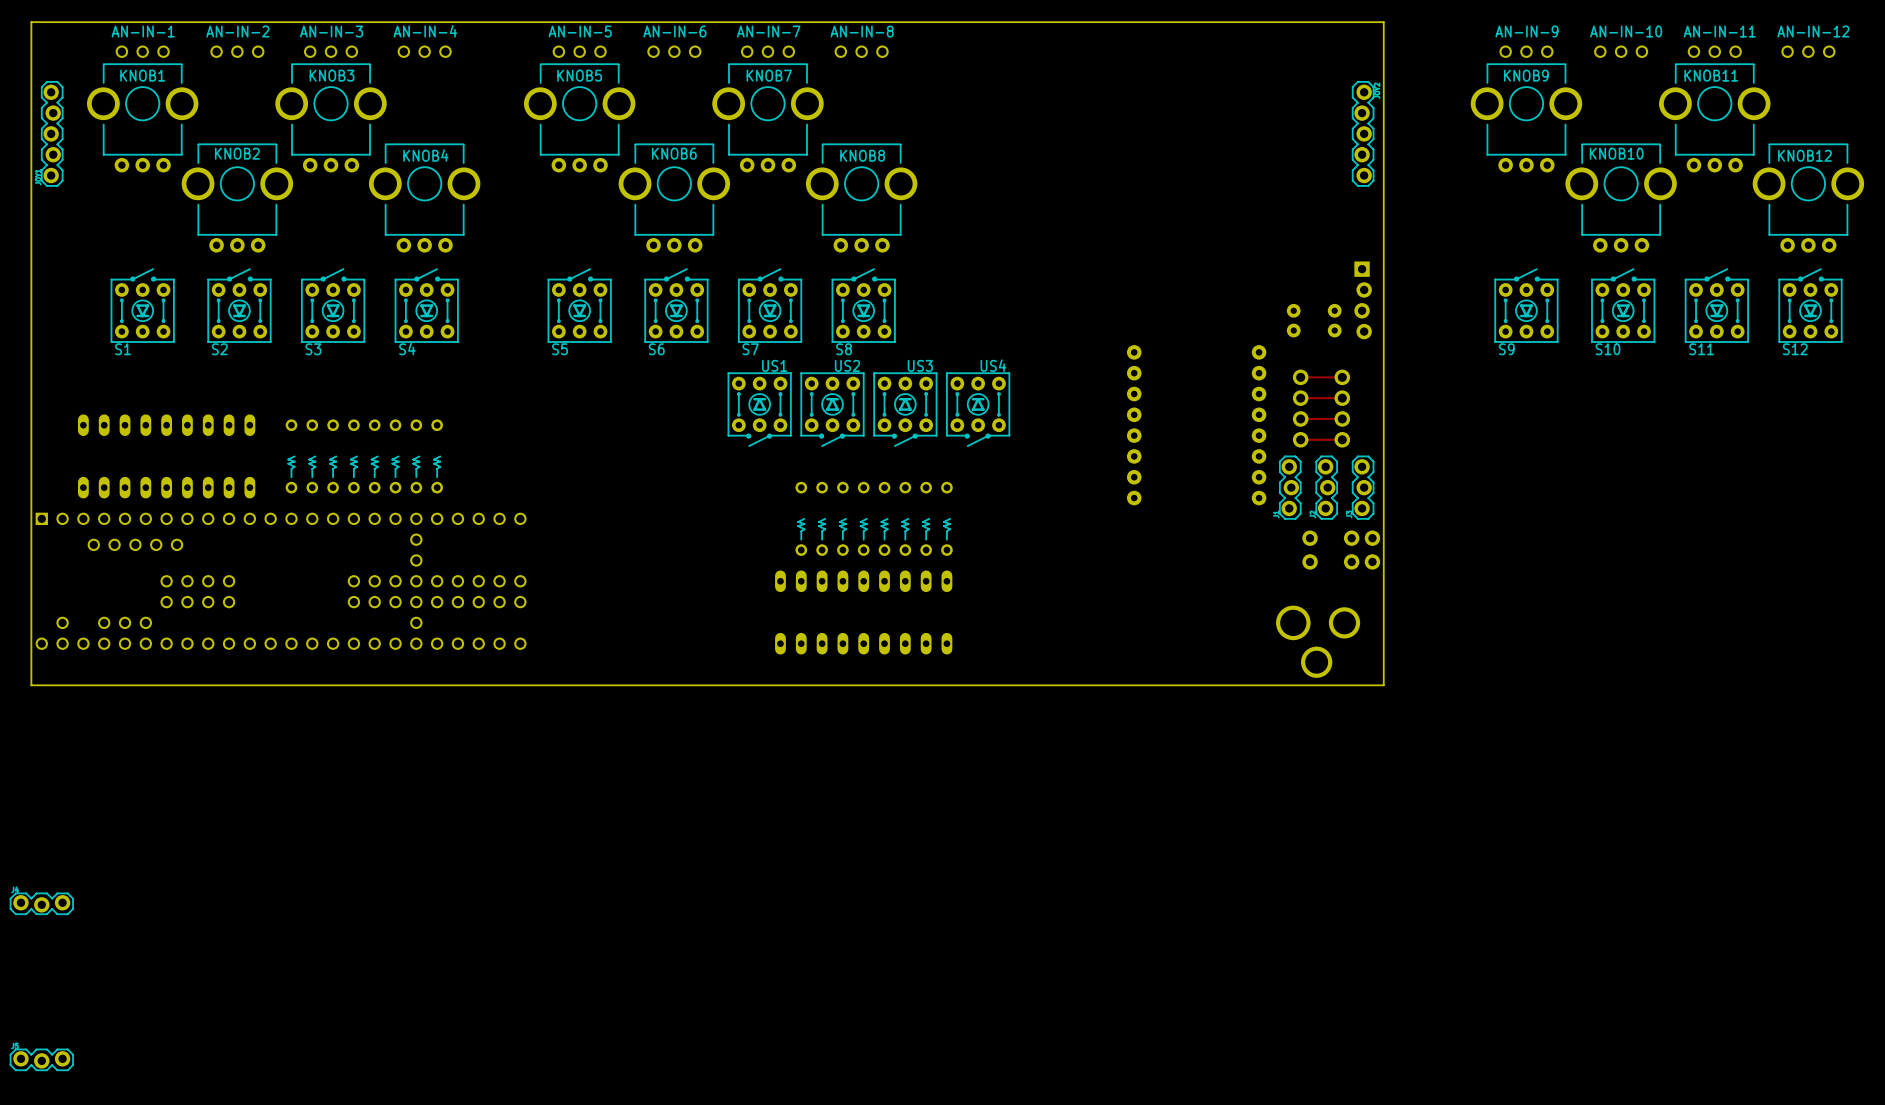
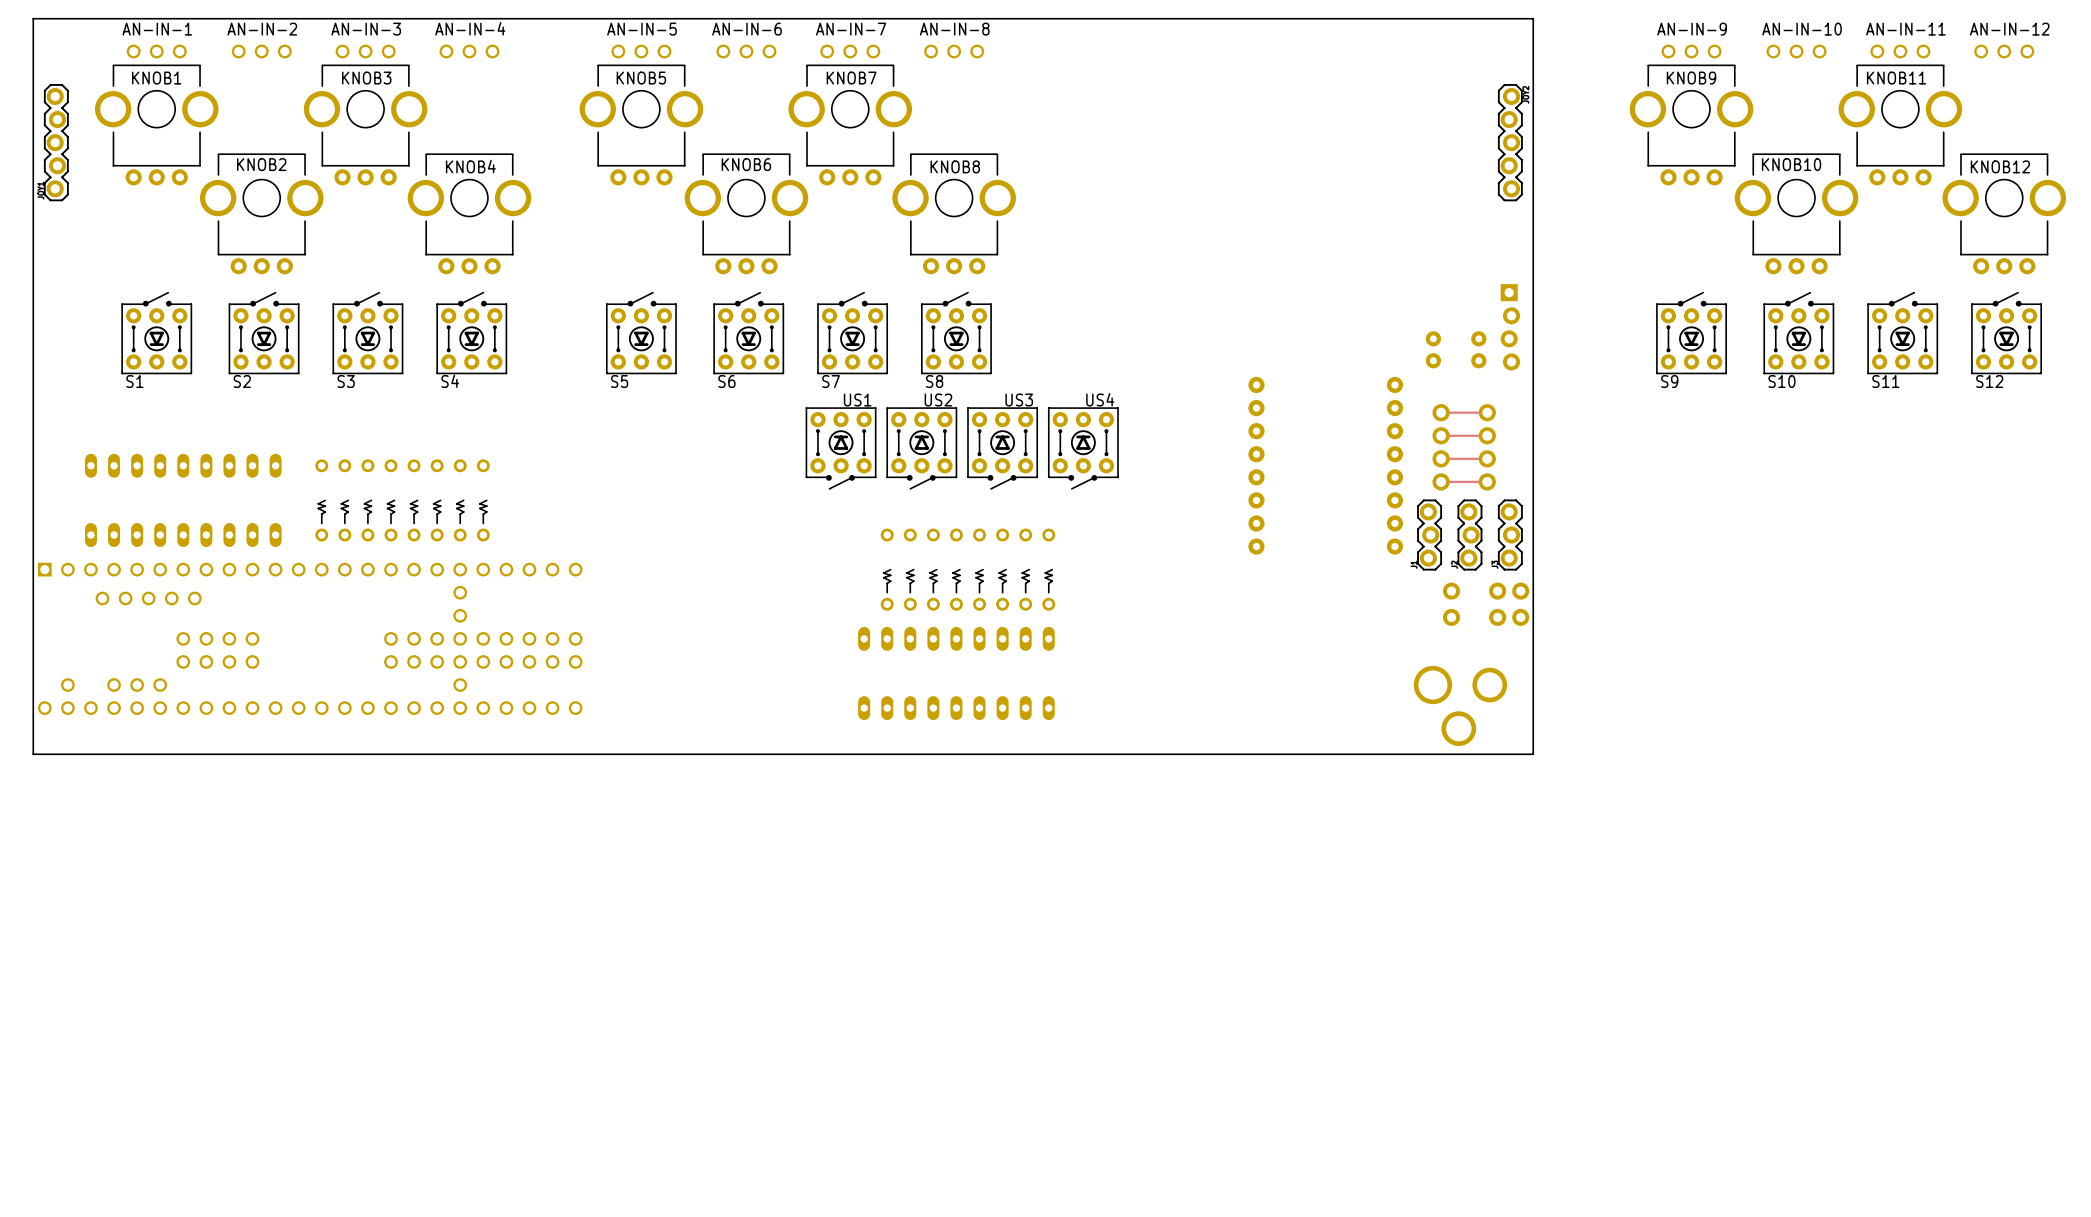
part: (41, 903) -> none
part: (41, 1059) -> none

